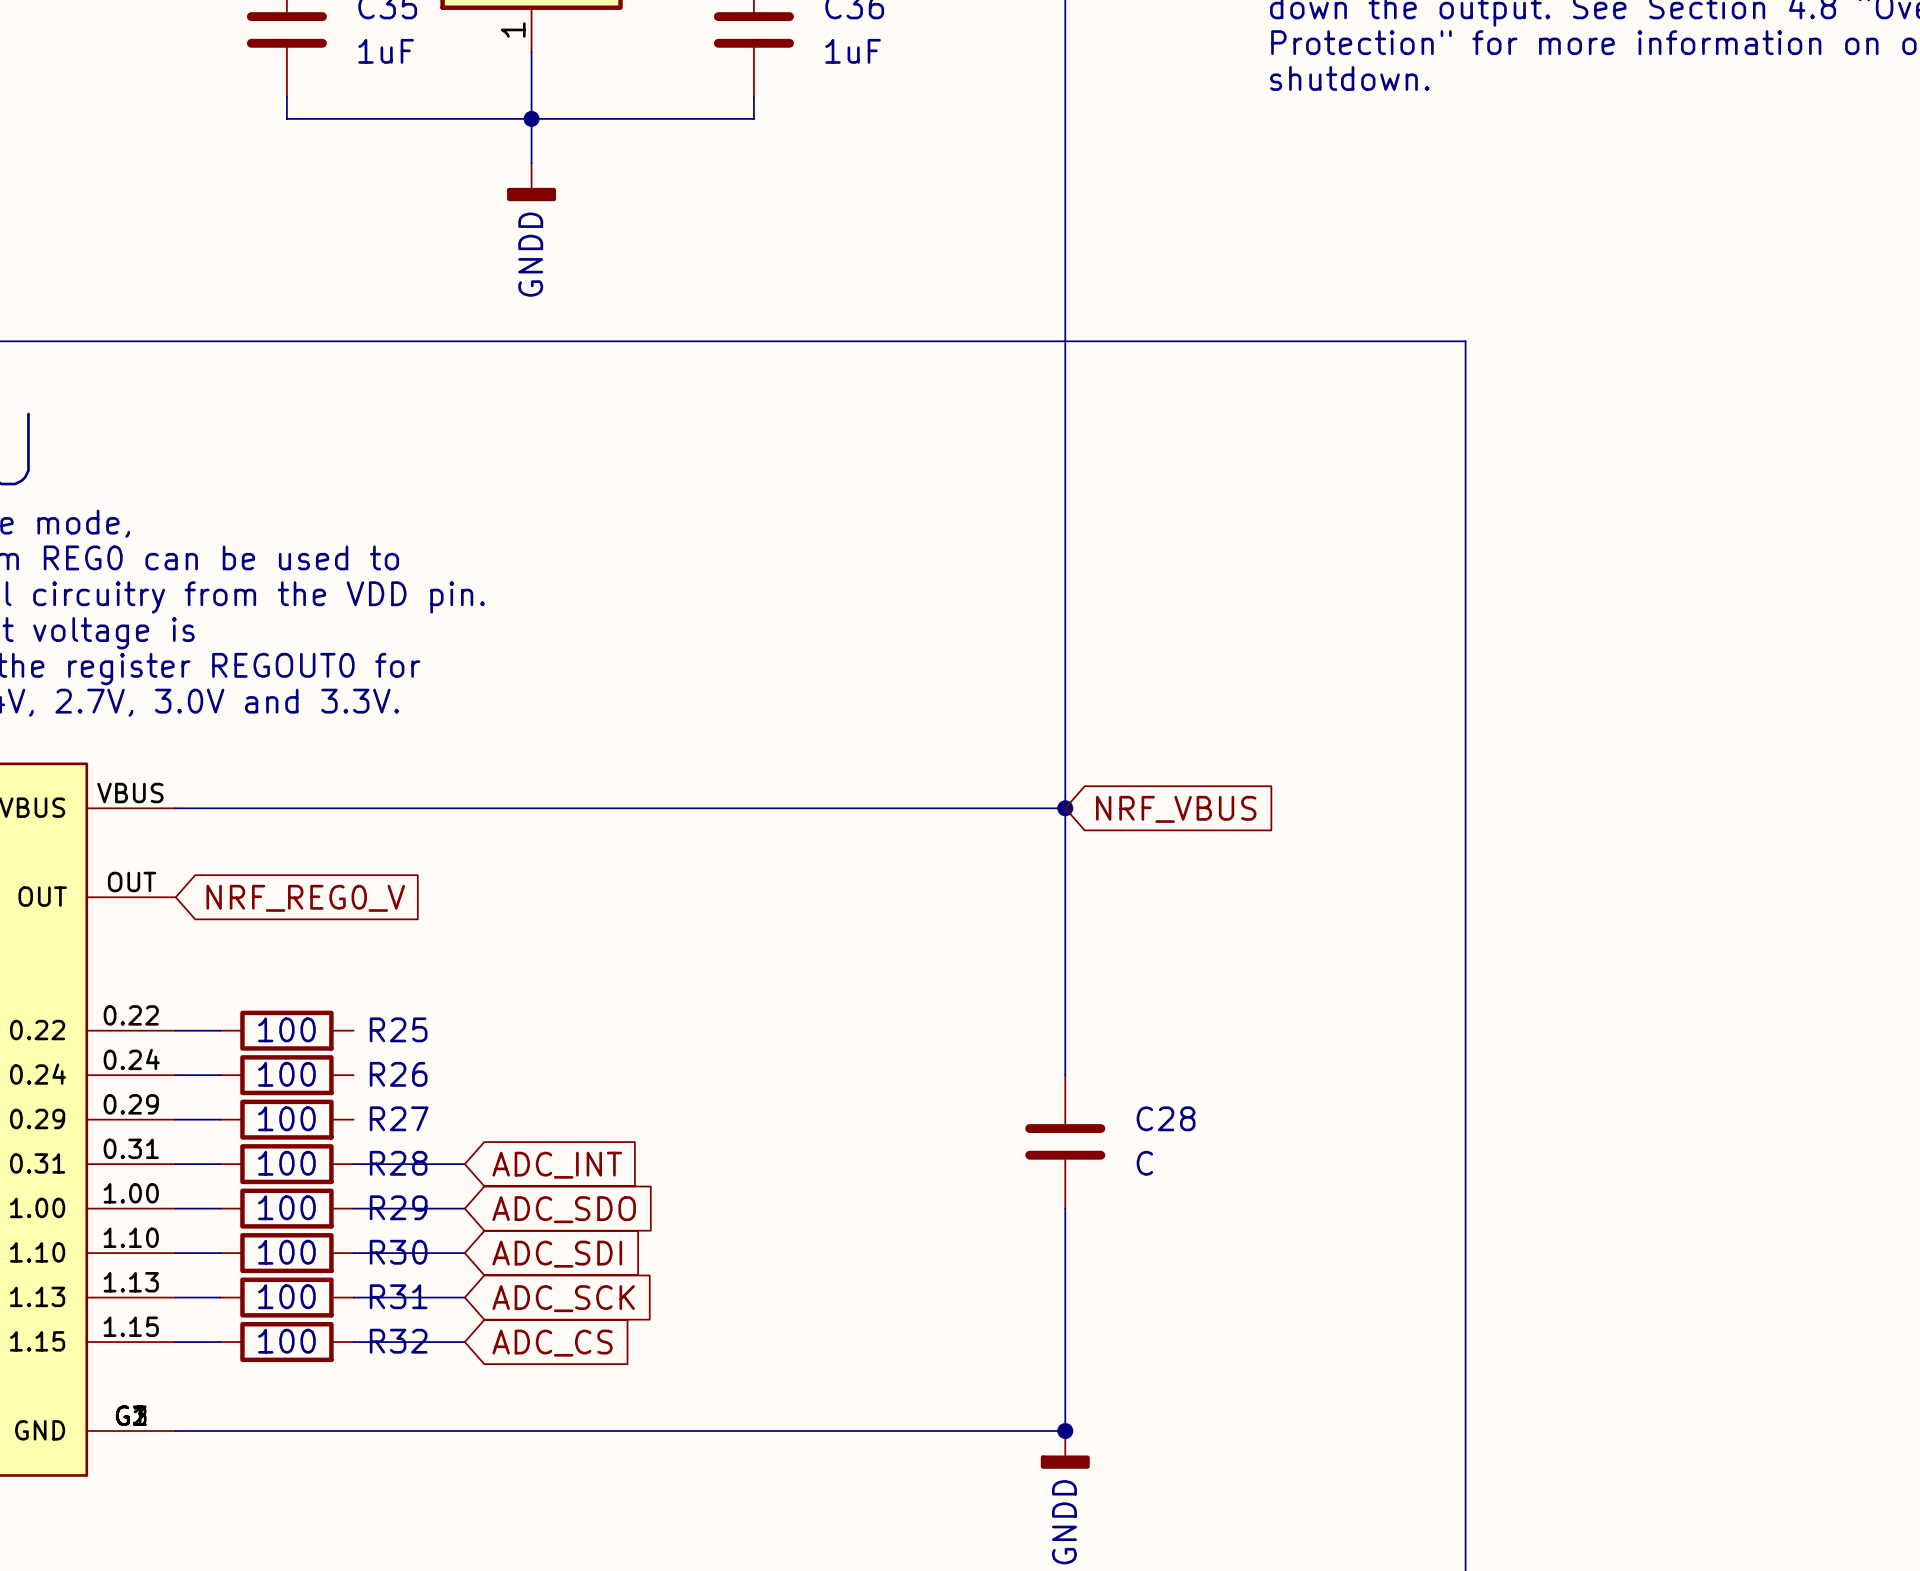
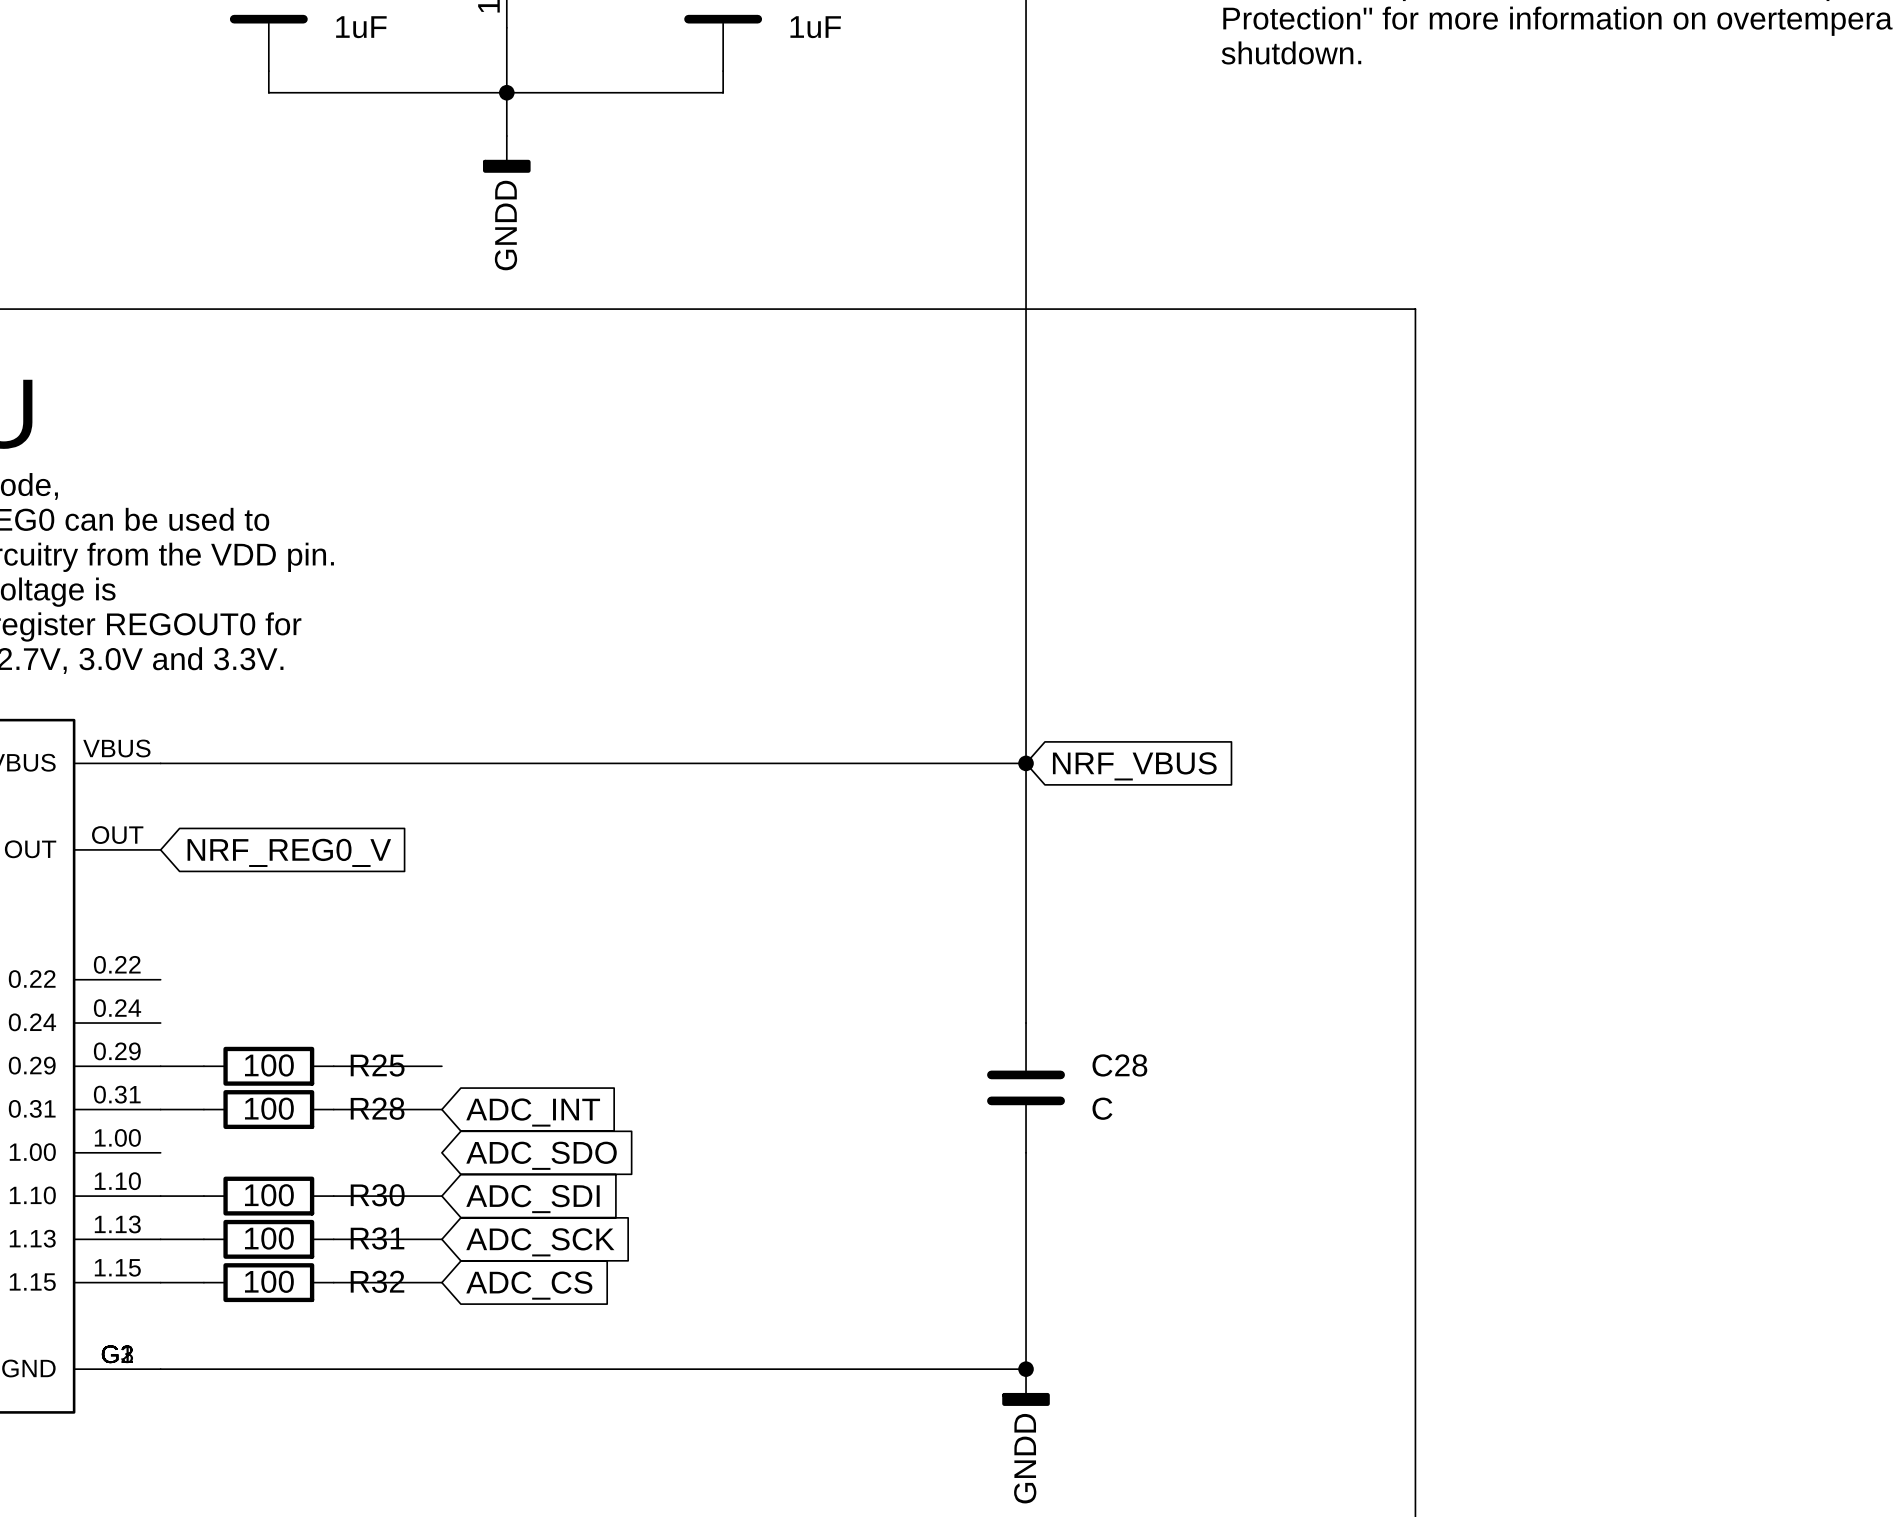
wire: (175, 1030) (220, 1030) -> none
R25: 100 (286, 1030) -> none
wire: (175, 1075) (220, 1075) -> none
R26: 100 (286, 1075) -> none
R27 name: R27 (399, 1118) -> R25 (377, 1065)
wire: (175, 1208) (220, 1208) -> none
R29: 100 (286, 1208) -> none
wire: (353, 1208) (464, 1208) -> (333, 1066) (441, 1066)

